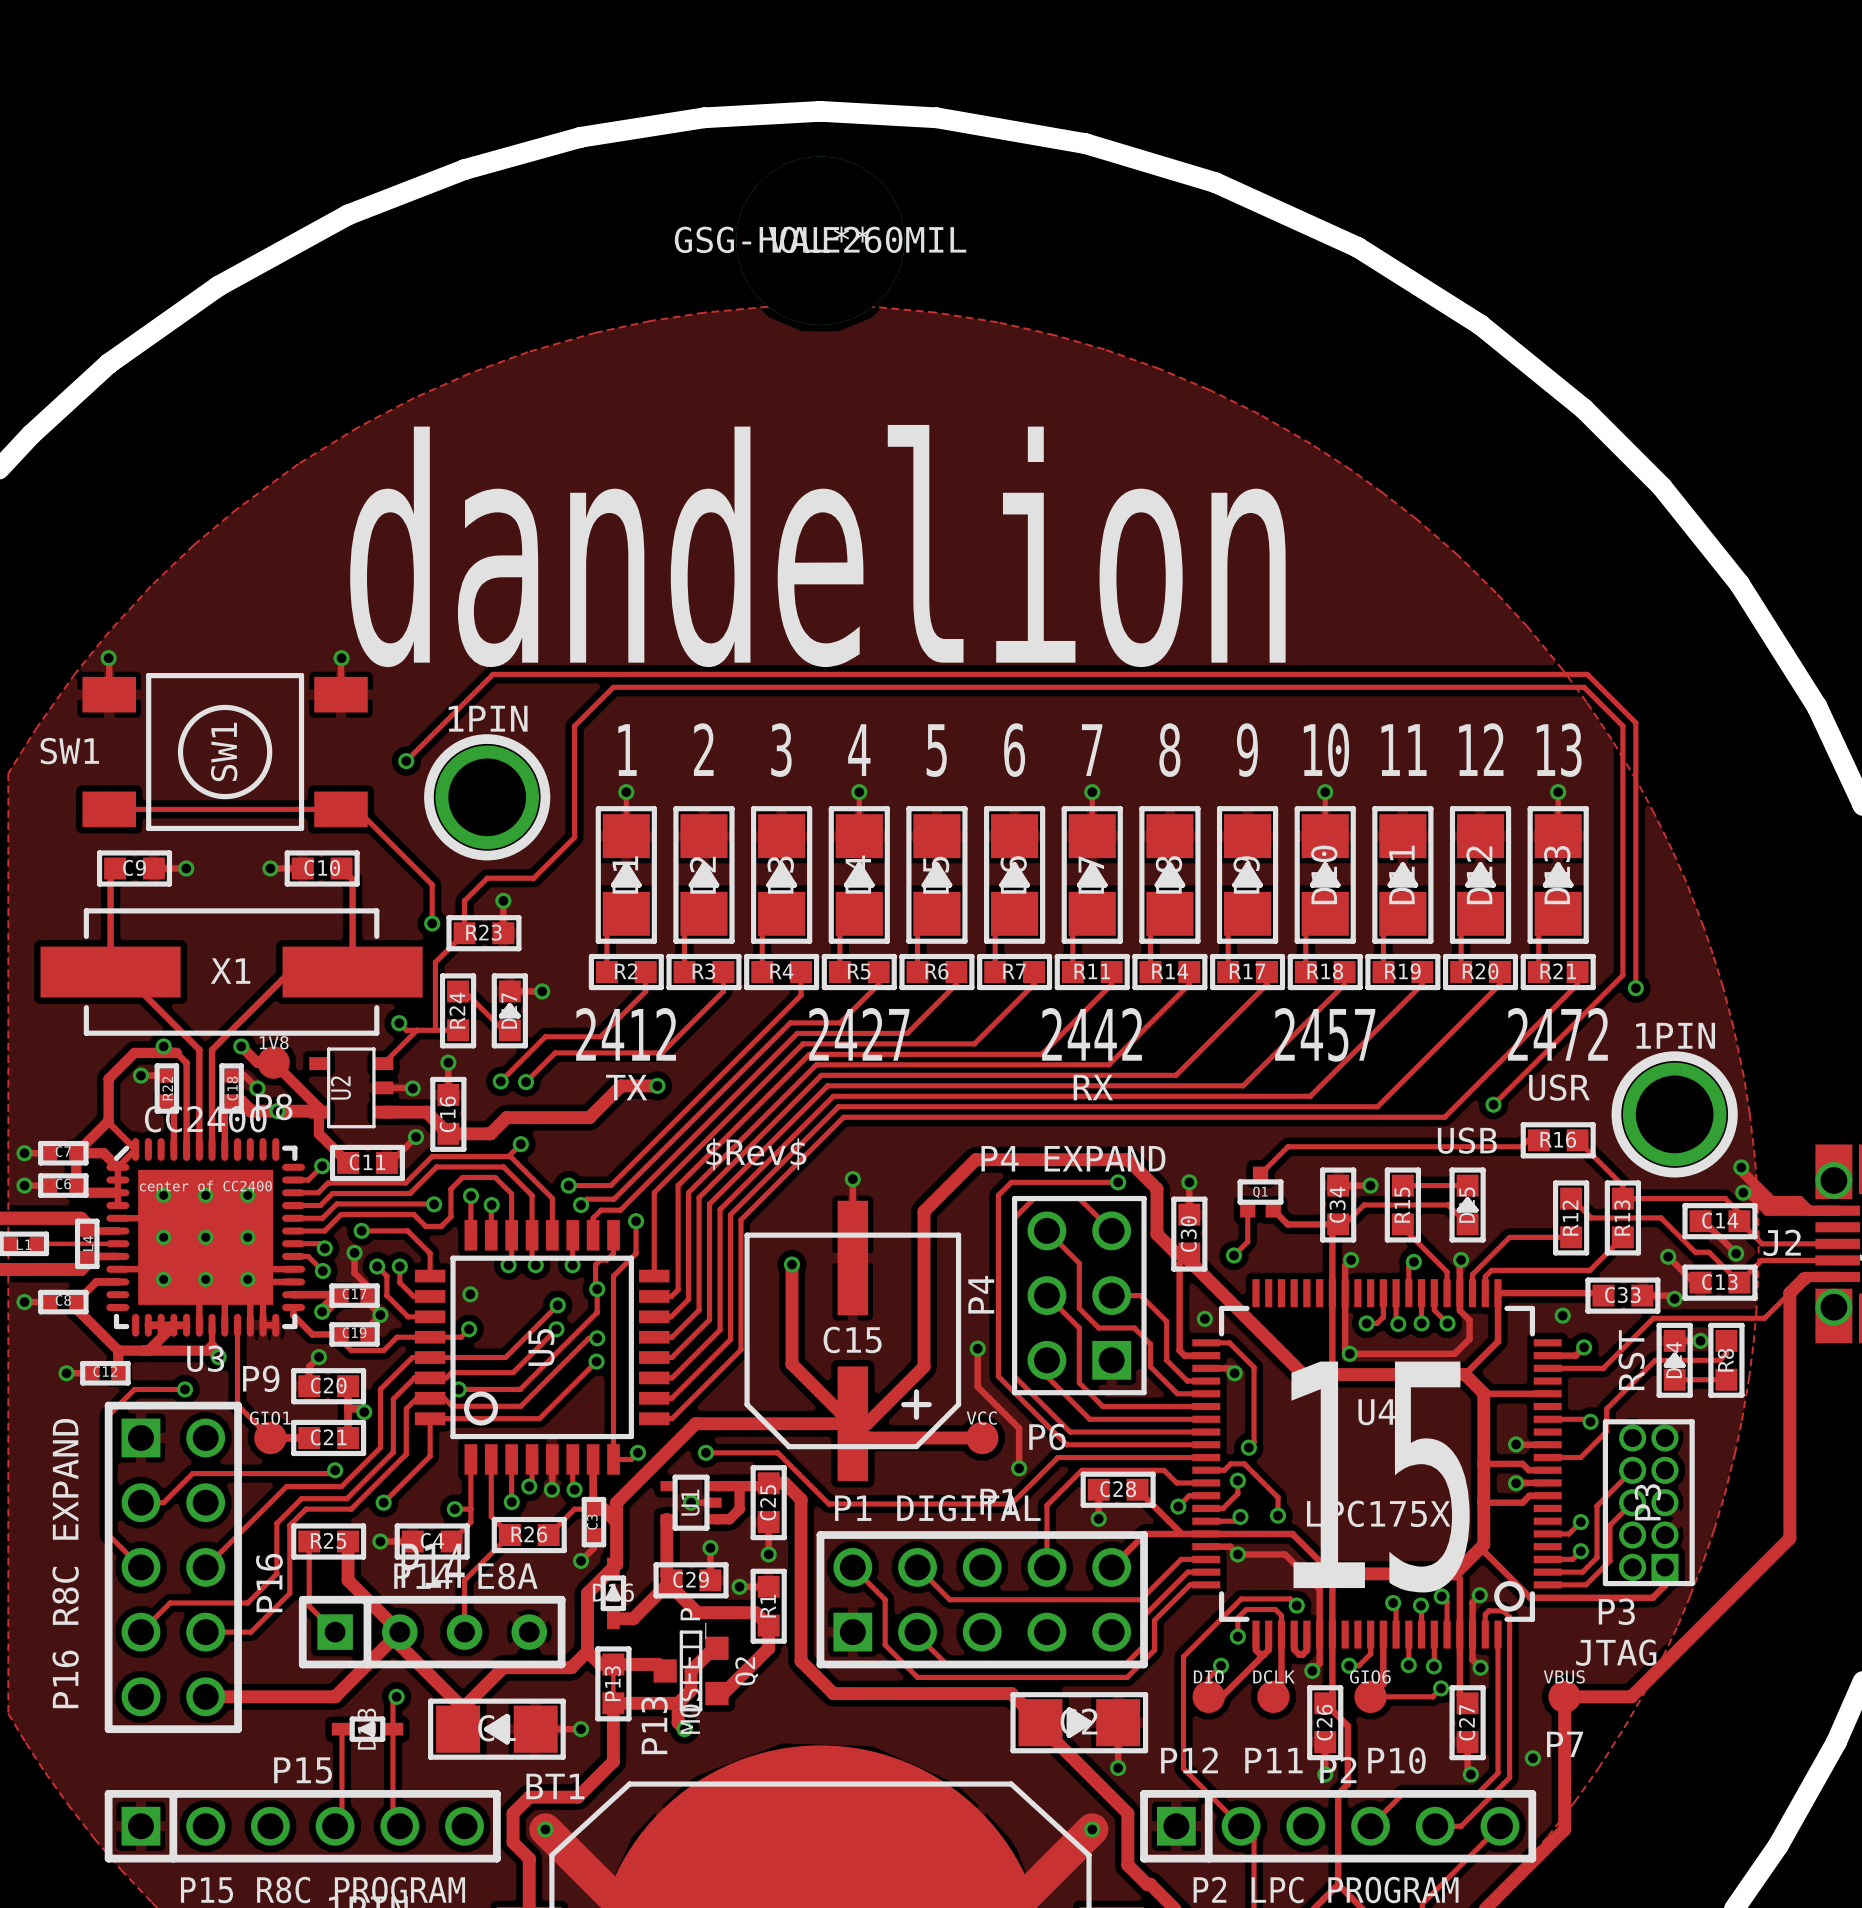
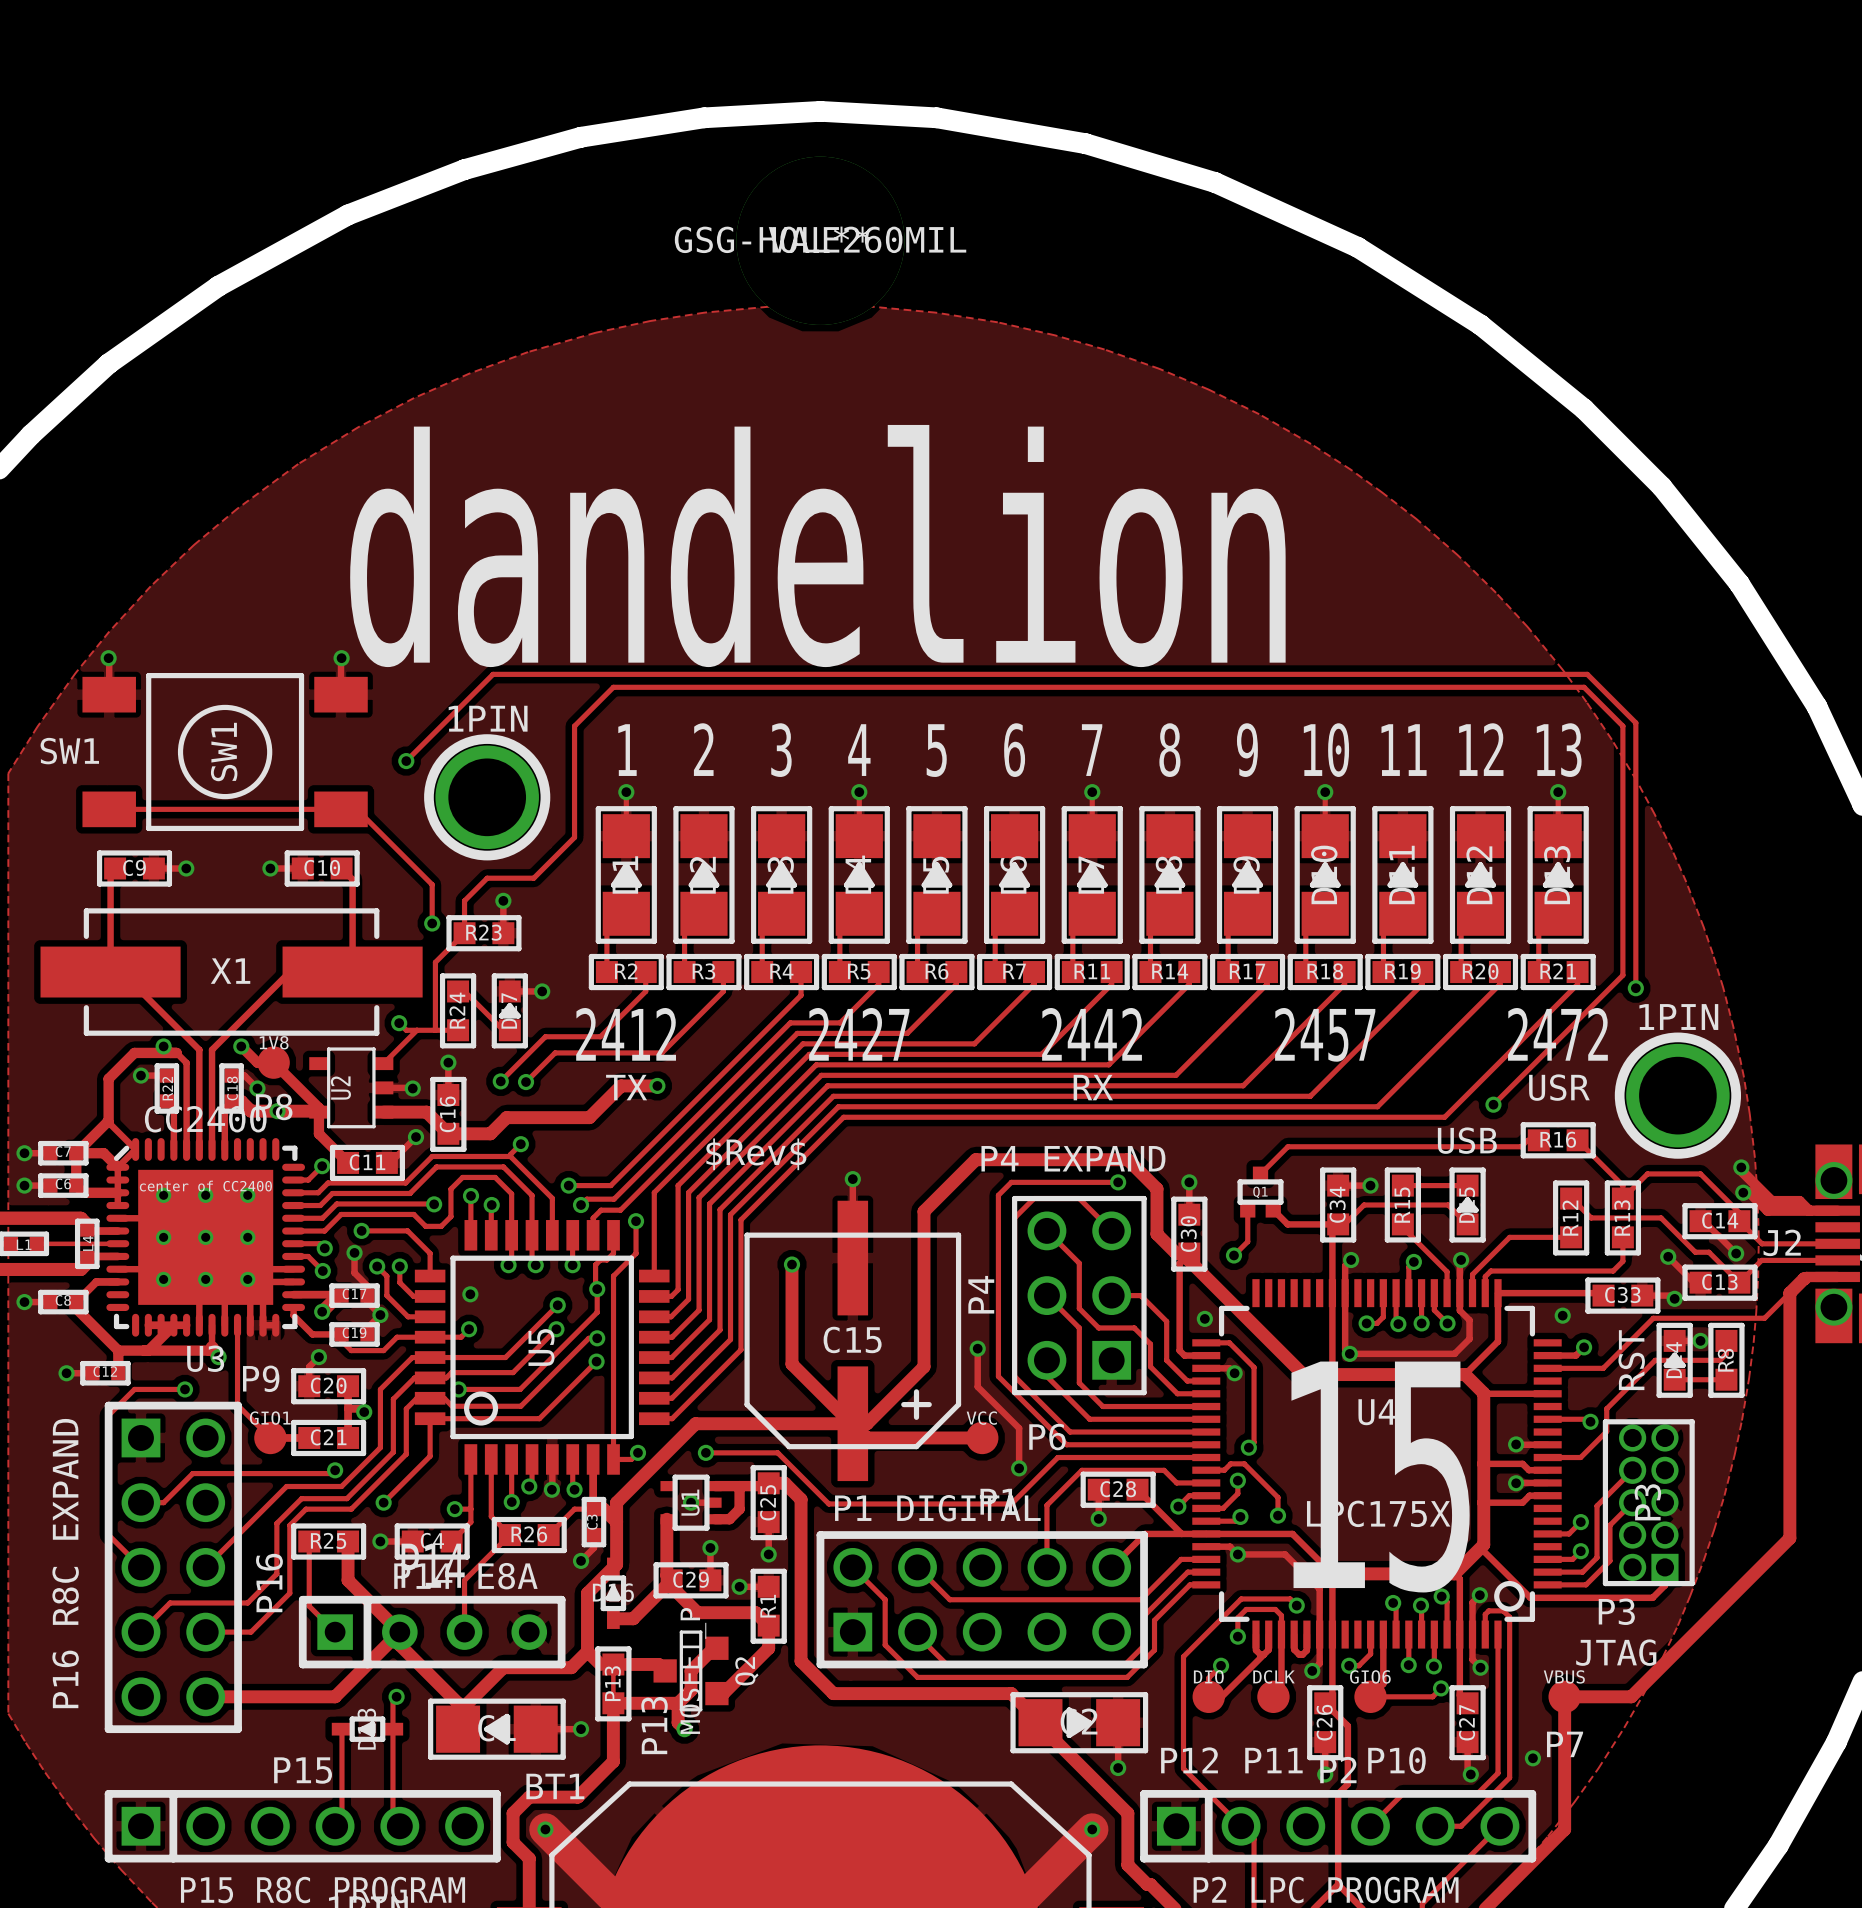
1PIN position: (1674, 1114) -> (1677, 1095)
track: (1622, 1198) (1725, 1198) -> (1622, 1198) (1647, 1173) (1700, 1173) (1725, 1198)
track: (1622, 1237) (1589, 1270) (1490, 1271) -> (1622, 1237) (1622, 1261) (1613, 1271) (1490, 1271)

